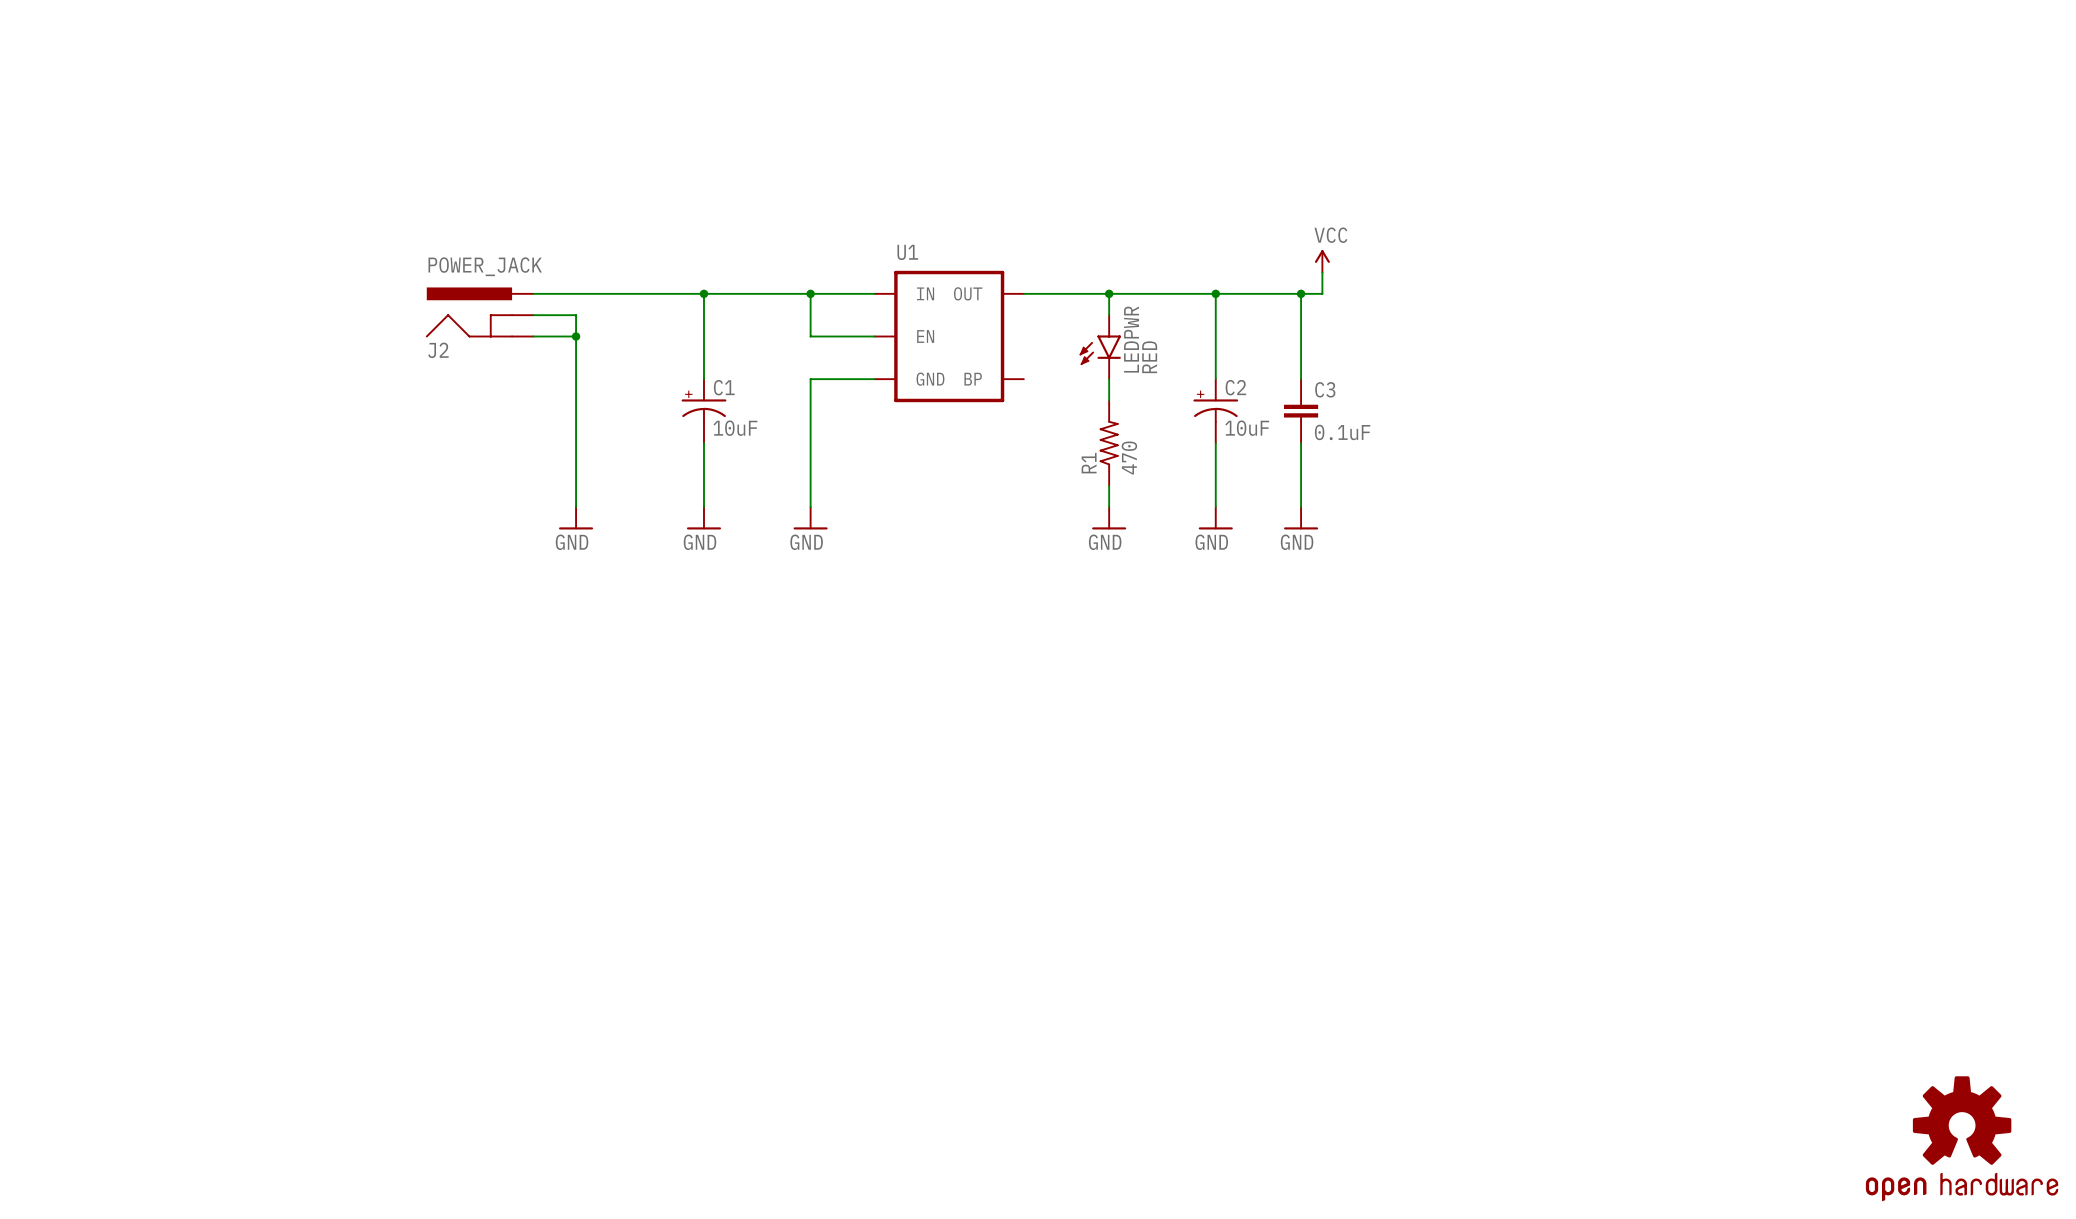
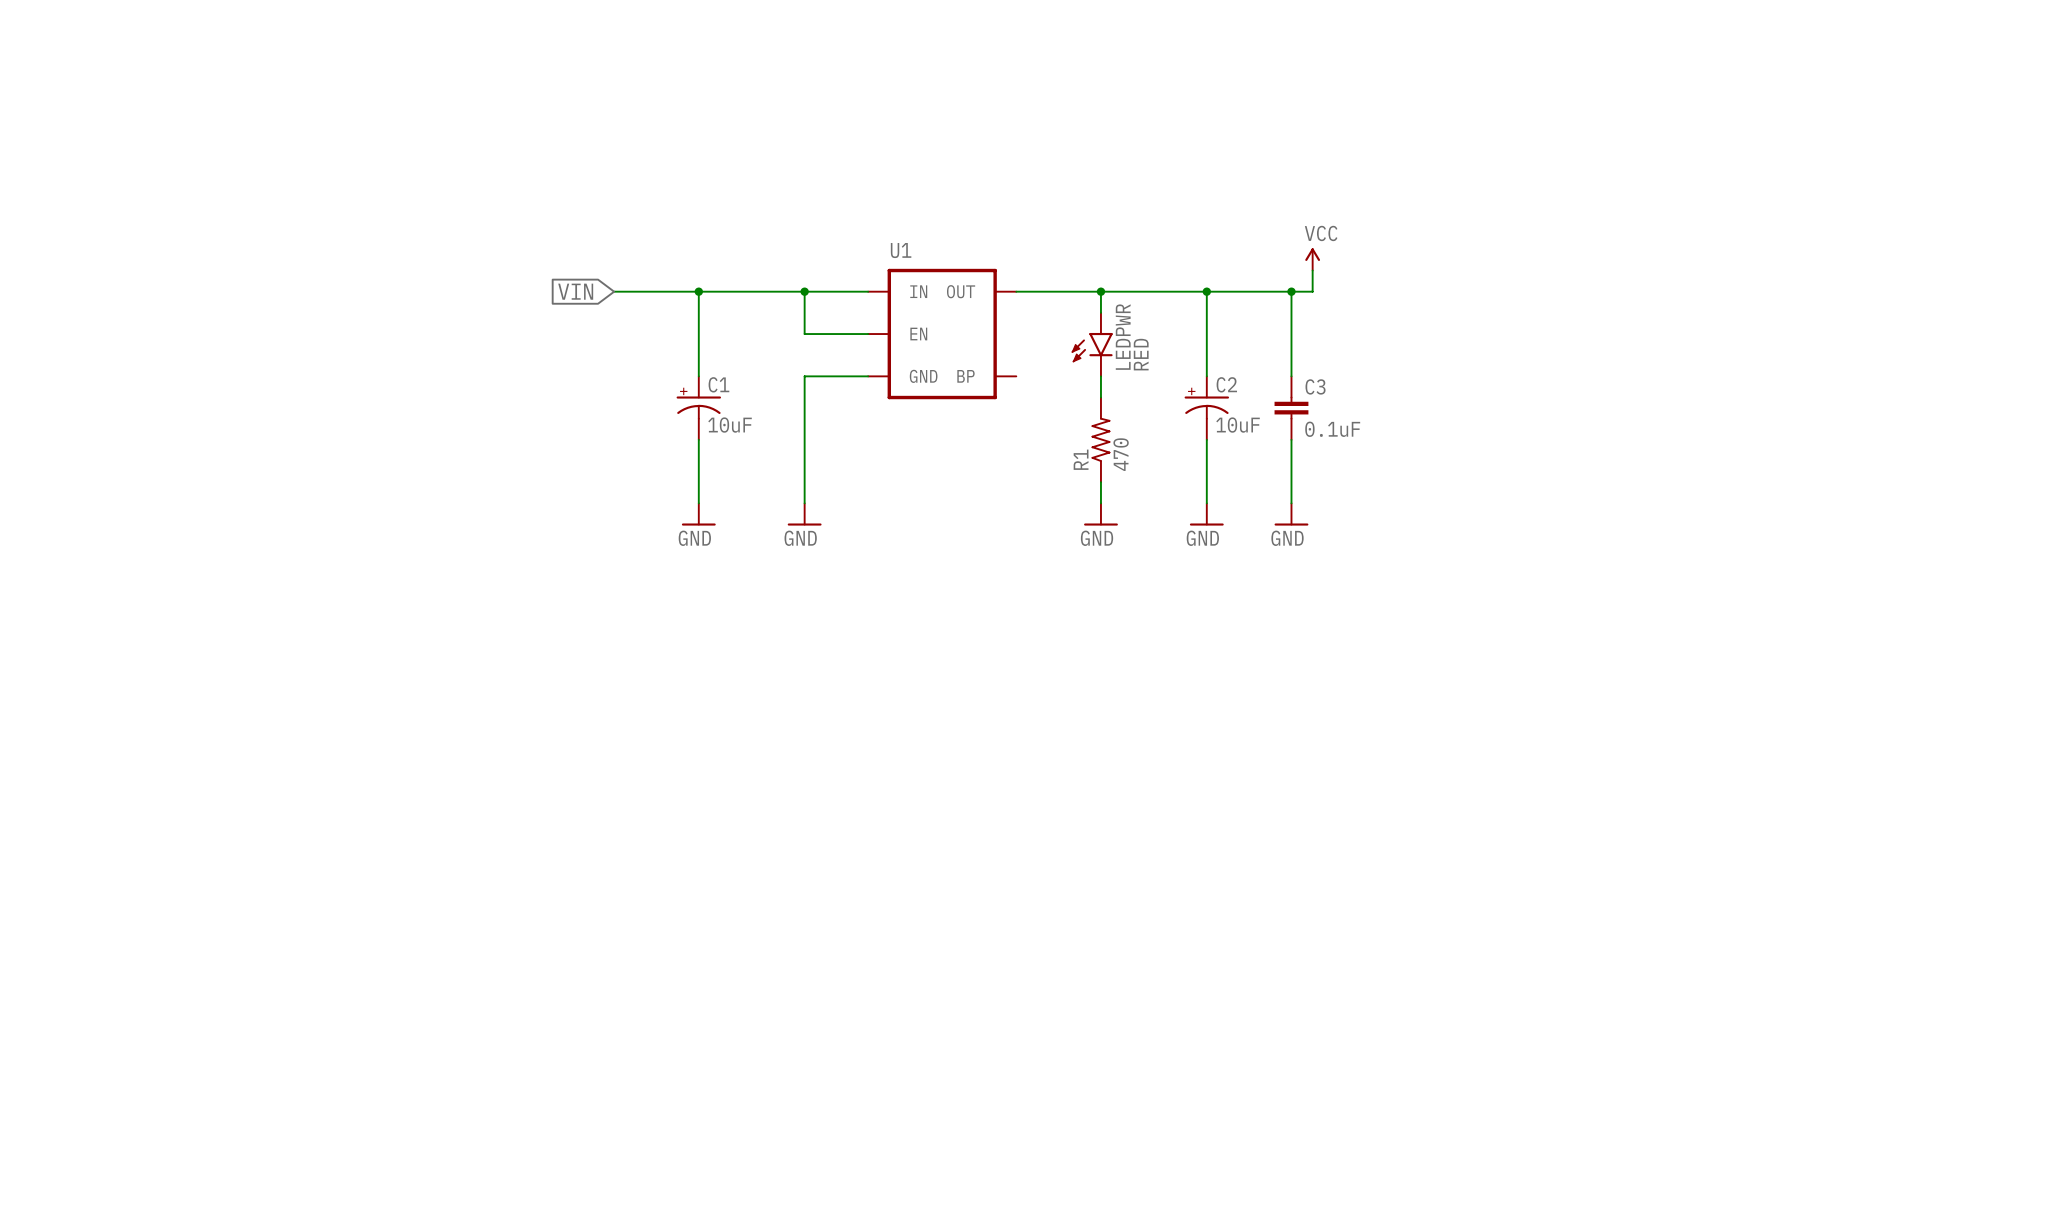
wire: (533, 293) (618, 293) -> none
global label: none -> VIN (575, 291)
J2: POWER_JACK (479, 312) -> none
wire: (533, 315) (576, 315) (576, 507) -> none
wire: (533, 336) (576, 336) -> none
junction: (576, 336) -> none
power symbol: GND (576, 518) -> none
part: (1962, 1138) -> none

